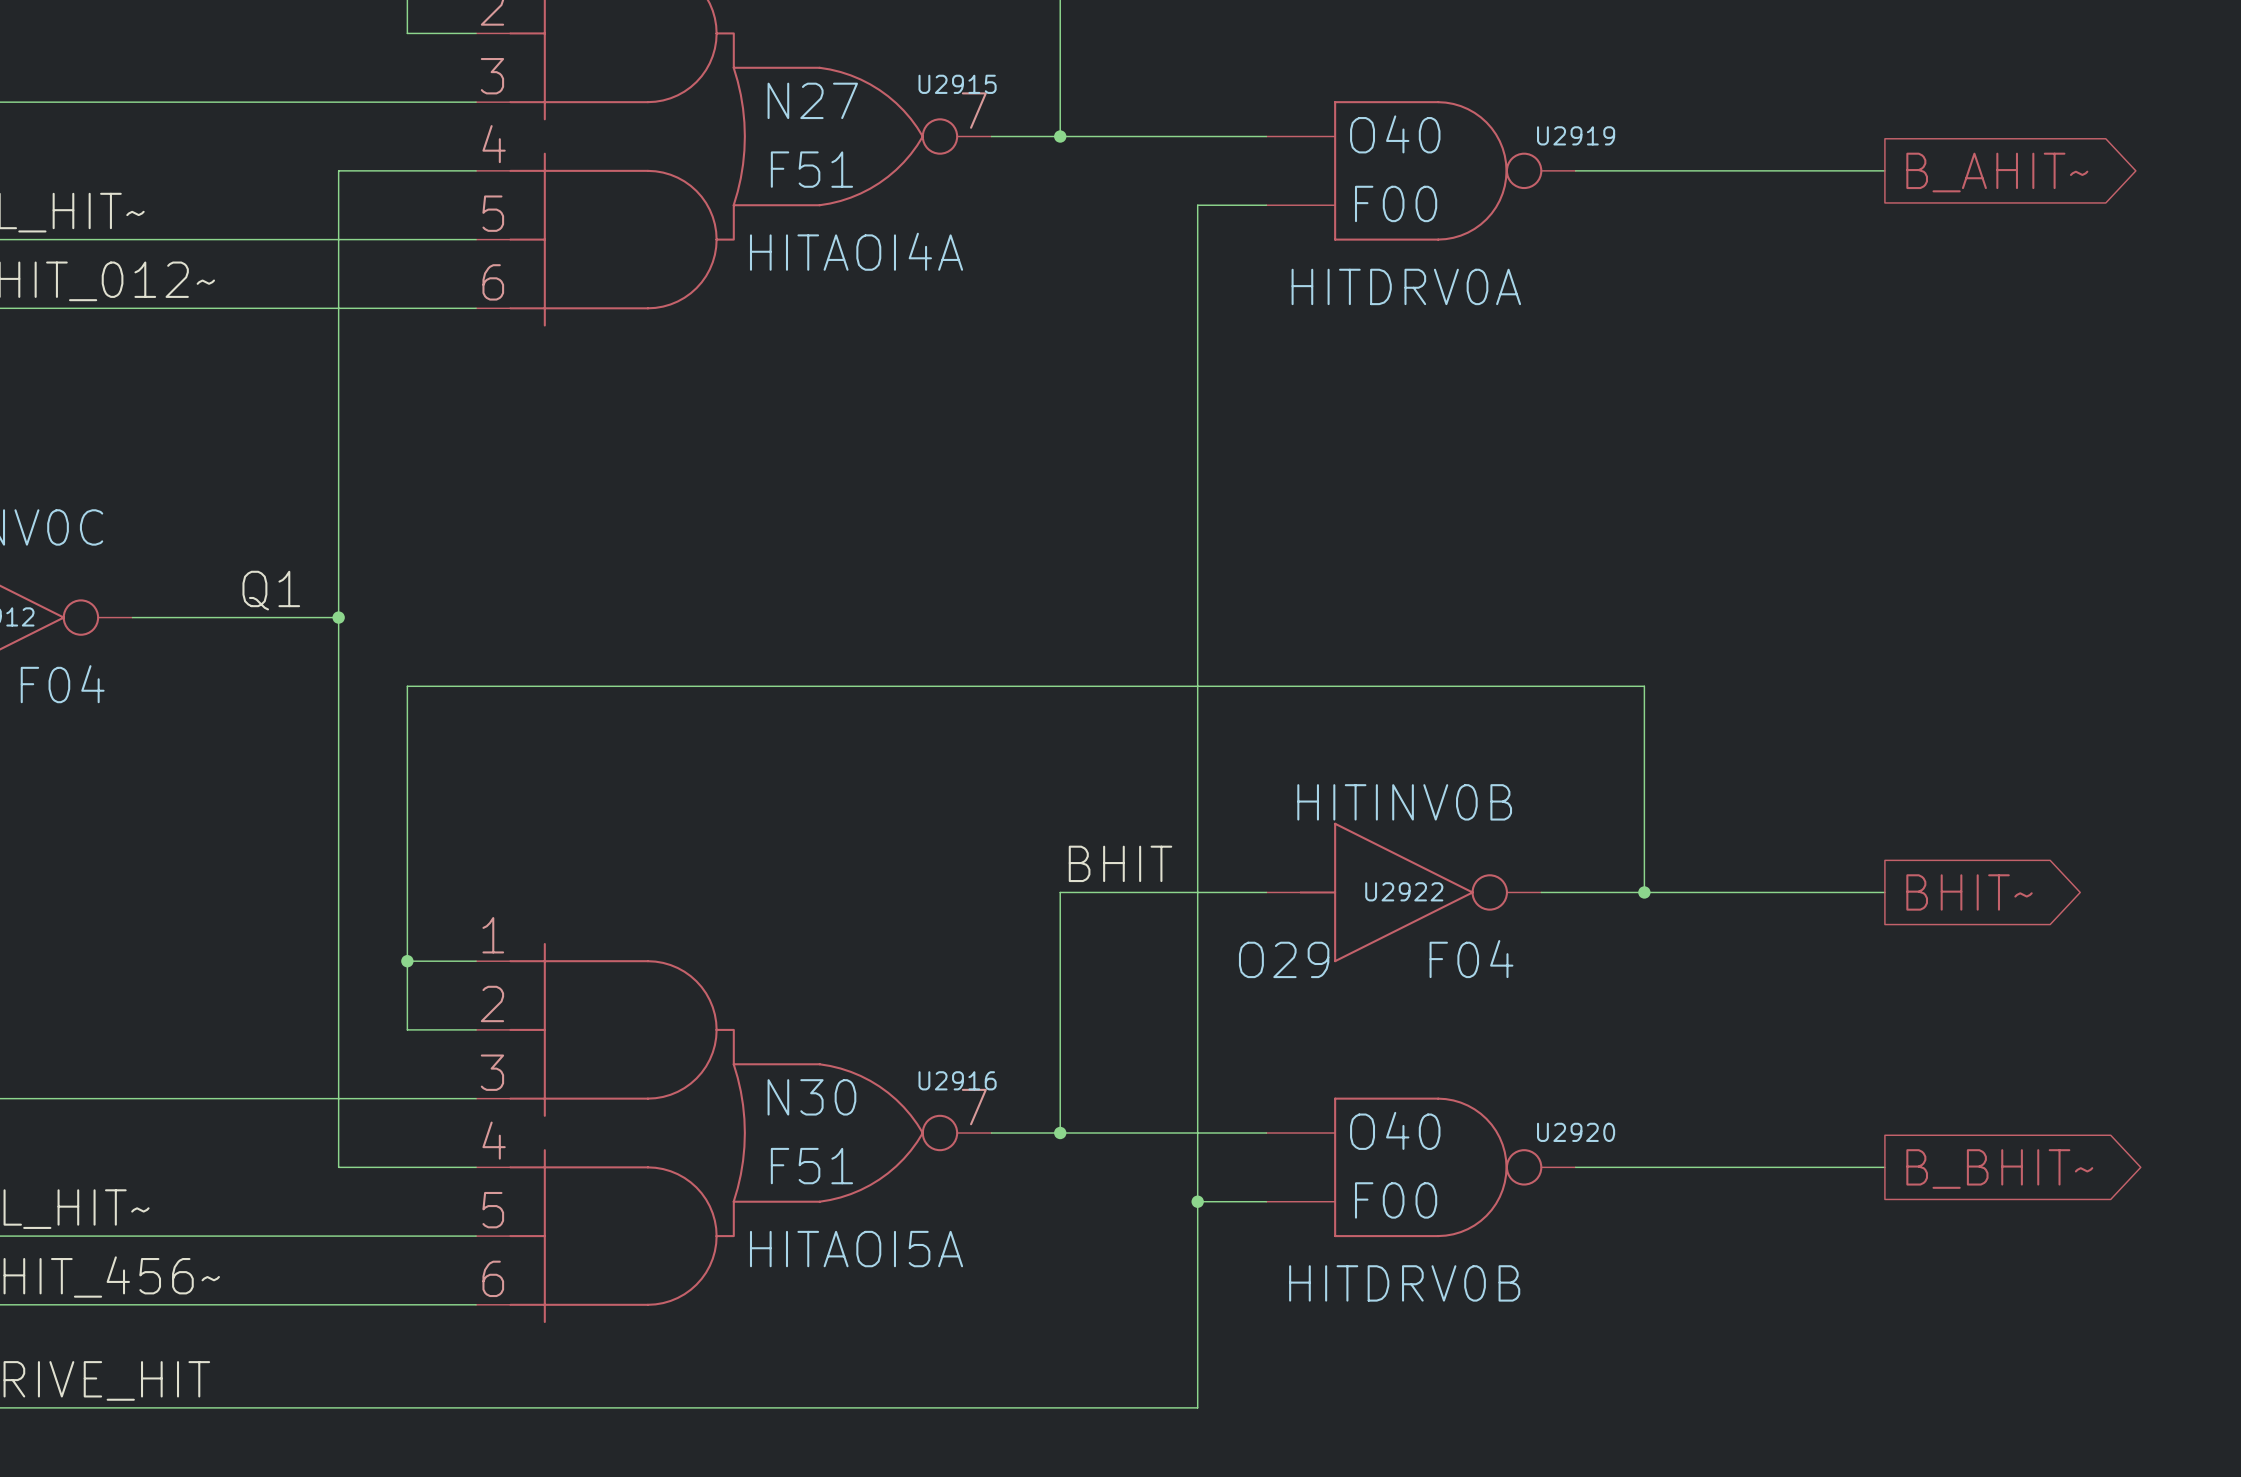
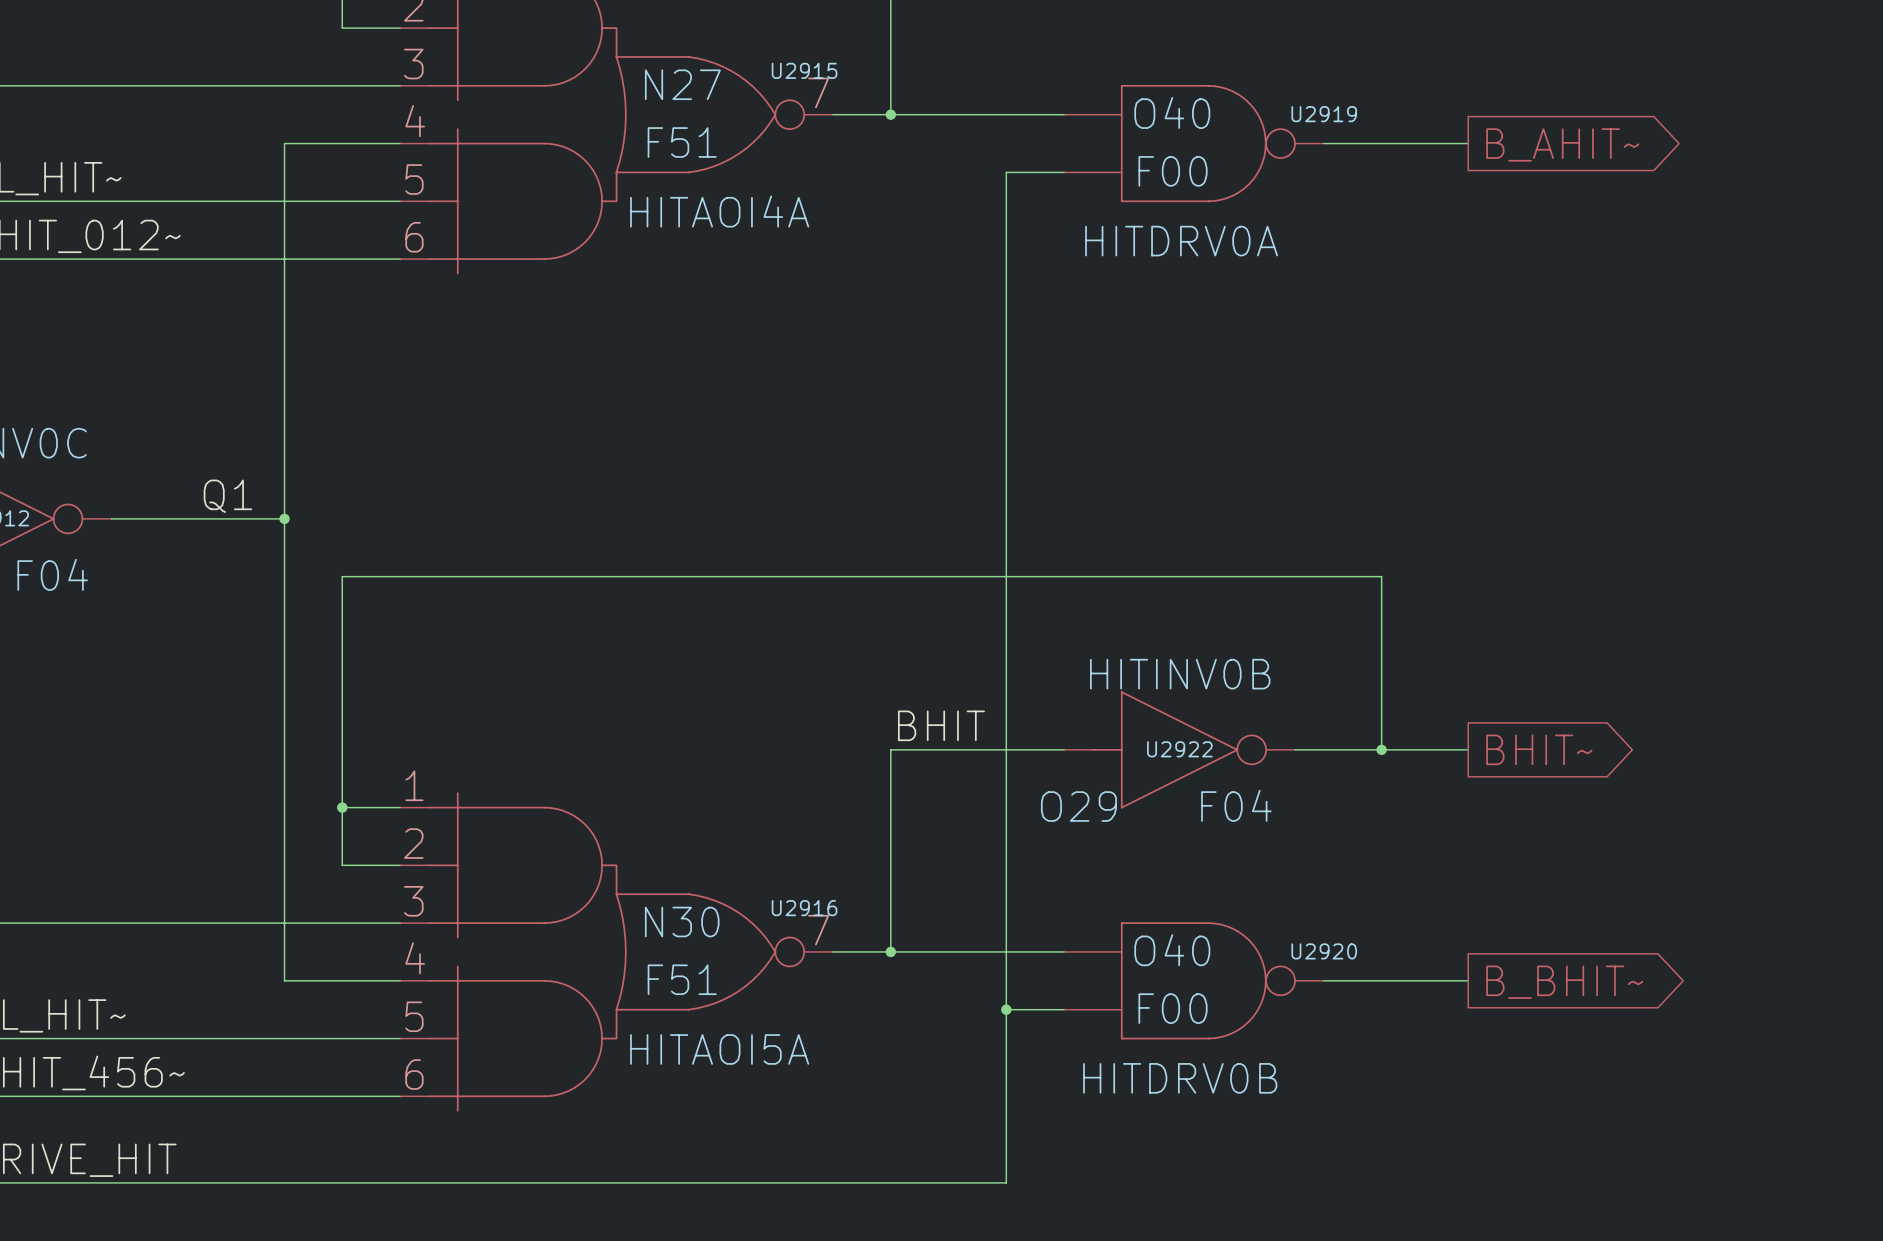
wire: (1747, 170) (1884, 170) -> none
global label position: B_AHIT~ (1997, 172) -> B_AHIT~ (1562, 144)
wire: (1747, 892) (1884, 892) -> none
global label position: BHIT~ (1969, 892) -> BHIT~ (1539, 749)
wire: (1747, 1167) (1884, 1167) -> none
global label position: B_BHIT~ (1999, 1168) -> B_BHIT~ (1564, 982)

